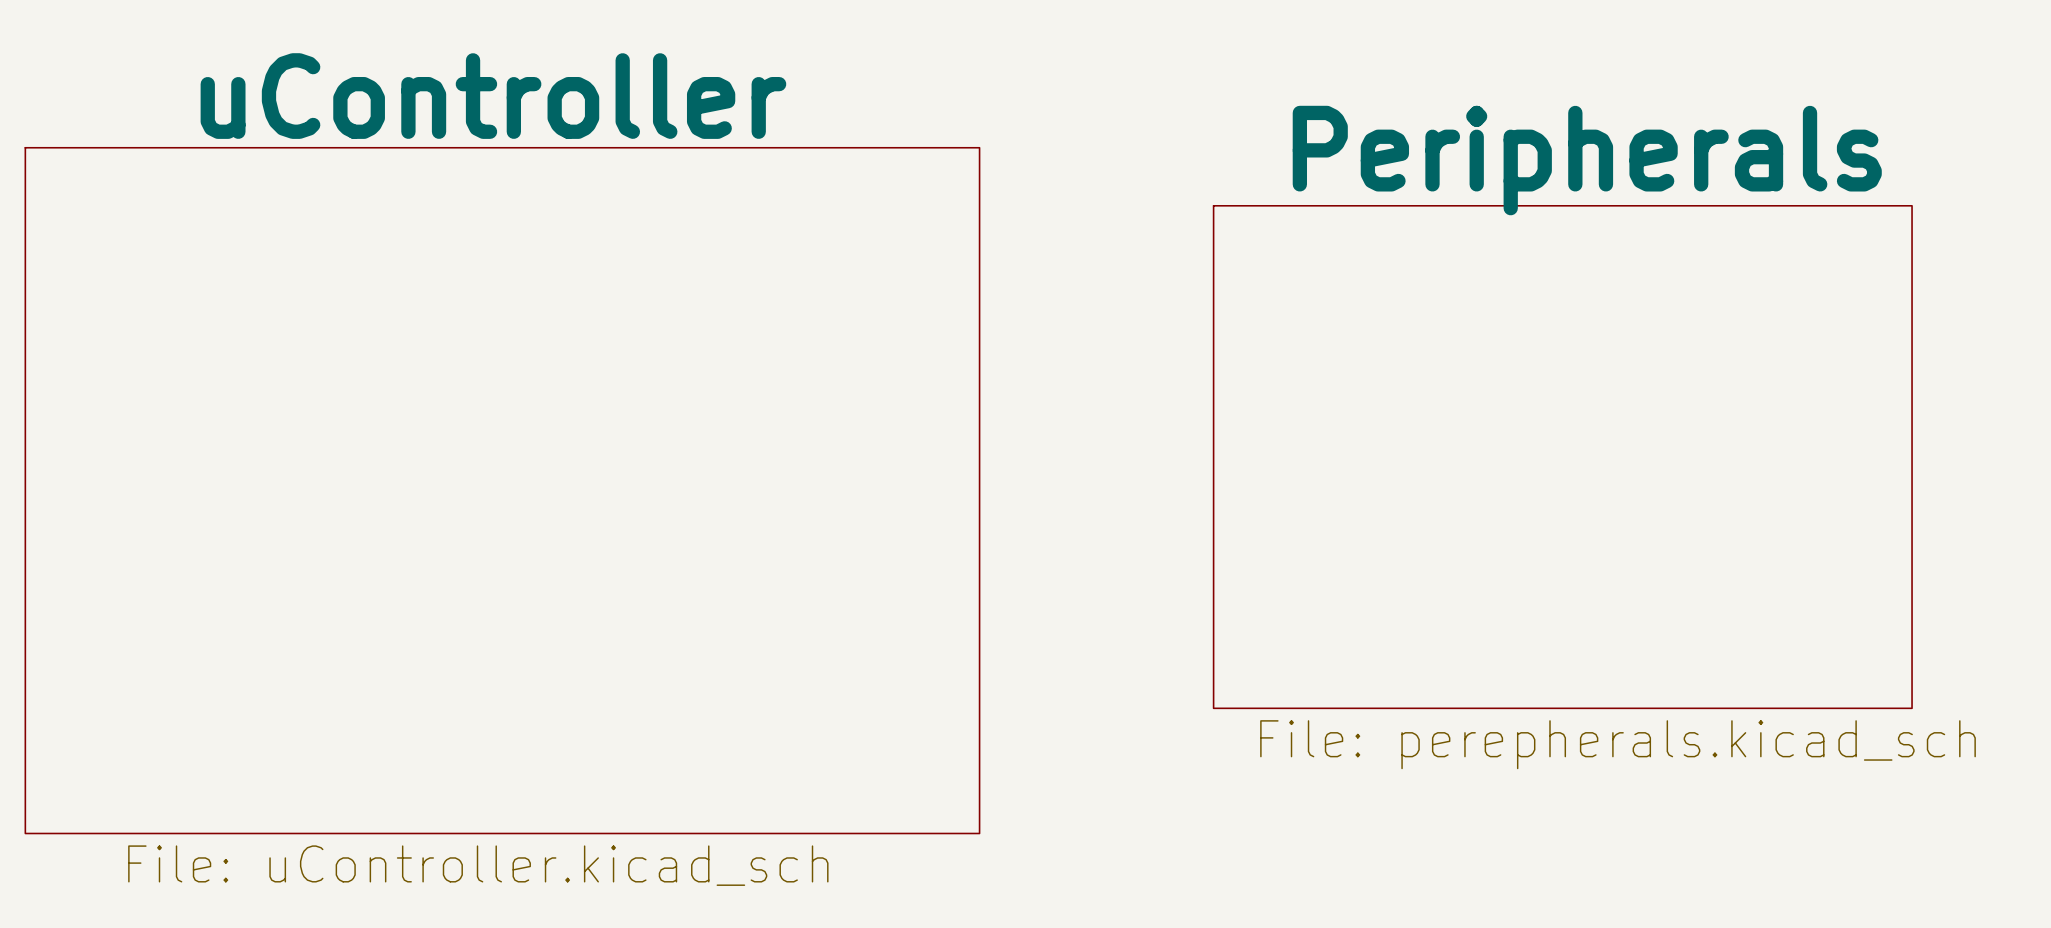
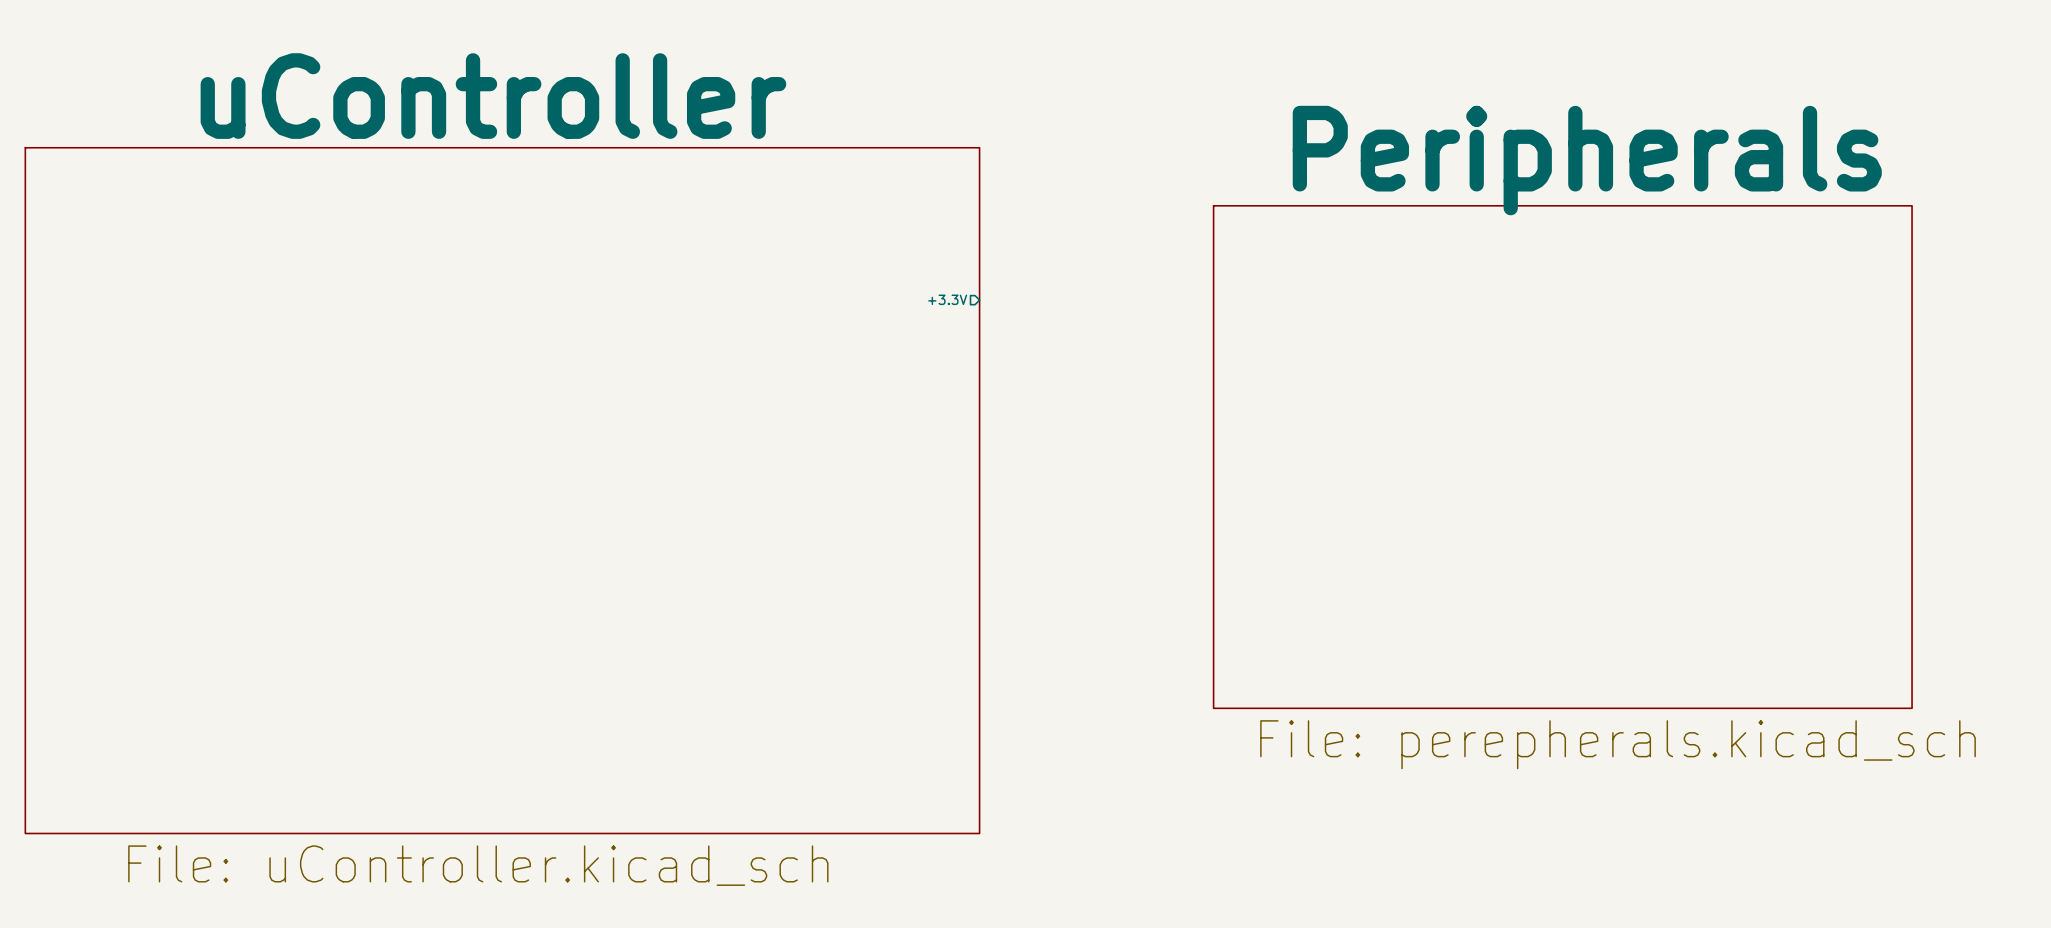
sheet pin: none -> +3.3V (947, 299)

